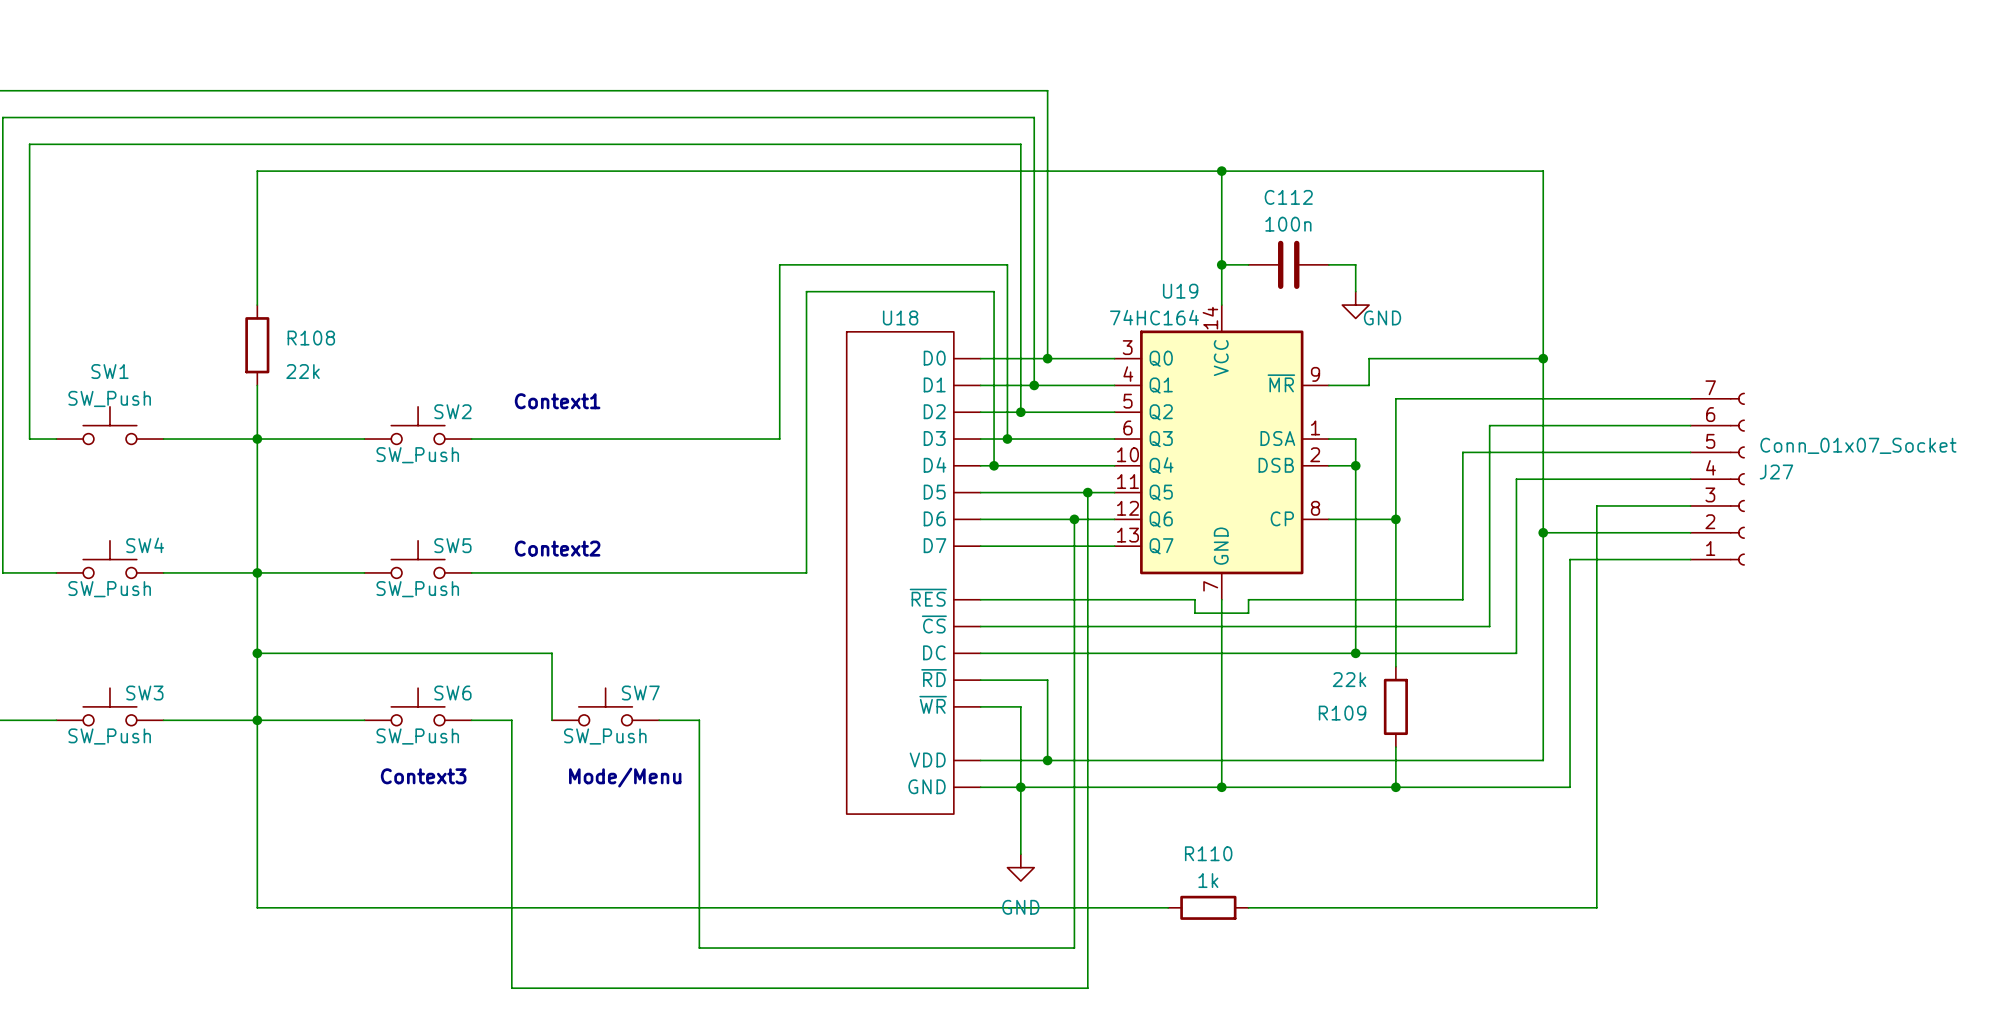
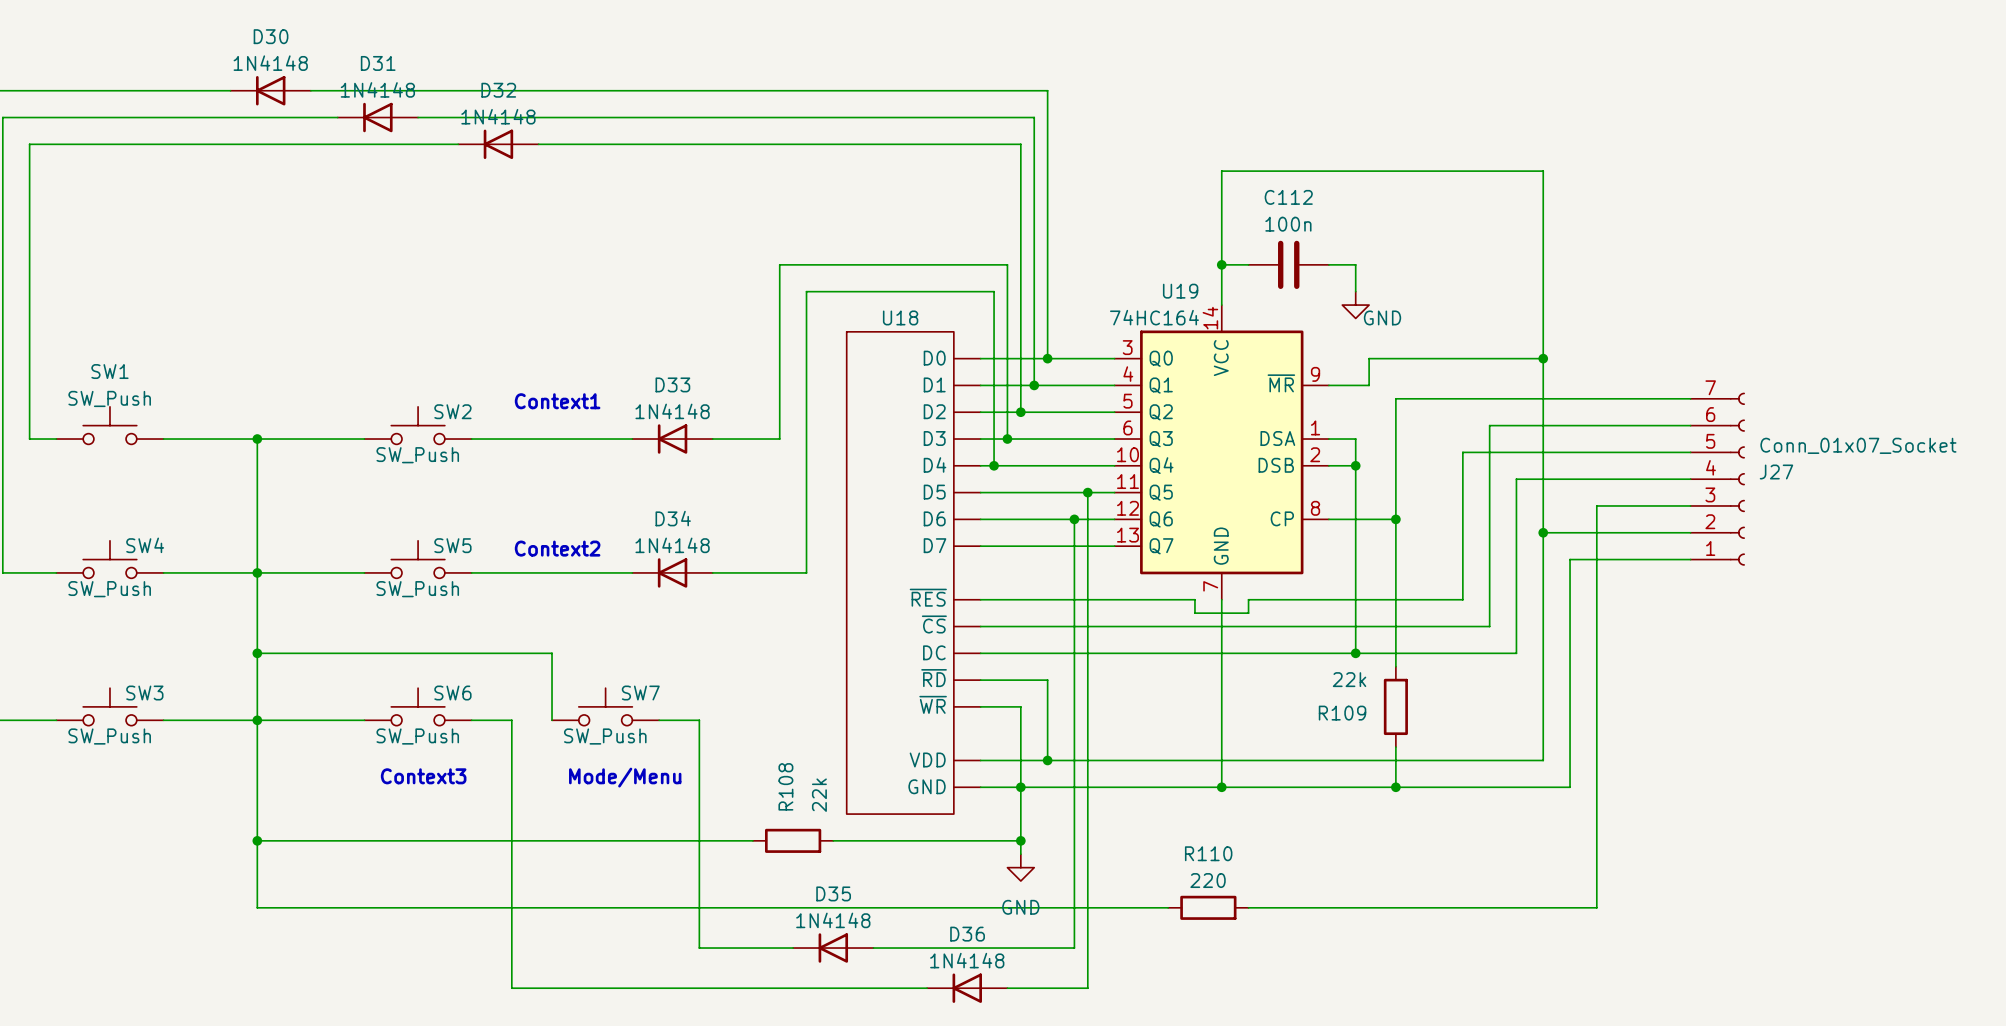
D30: none -> 1N4148 (270, 90)
D31: none -> 1N4148 (377, 117)
D32: none -> 1N4148 (498, 144)
wire: (1221, 171) (257, 171) (257, 305) -> none
junction: (1221, 171) -> none
R108 name position: R108 (311, 338) -> R108 (785, 786)
R108 rotation: 0° (257, 345) -> 90° clockwise (793, 840)
R108 position: (257, 345) -> (793, 840)
R108 text position: 22k (303, 371) -> 22k (819, 795)
wire: (257, 385) (257, 439) -> none
D33: none -> 1N4148 (672, 439)
D34: none -> 1N4148 (672, 572)
wire: none -> (257, 840) (752, 840)
junction: none -> (257, 840)
wire: none -> (833, 840) (1020, 840)
junction: none -> (1020, 840)
R110 value: 1k (1208, 880) -> 220 (1208, 880)
D35: none -> 1N4148 (833, 948)
D36: none -> 1N4148 (967, 988)

